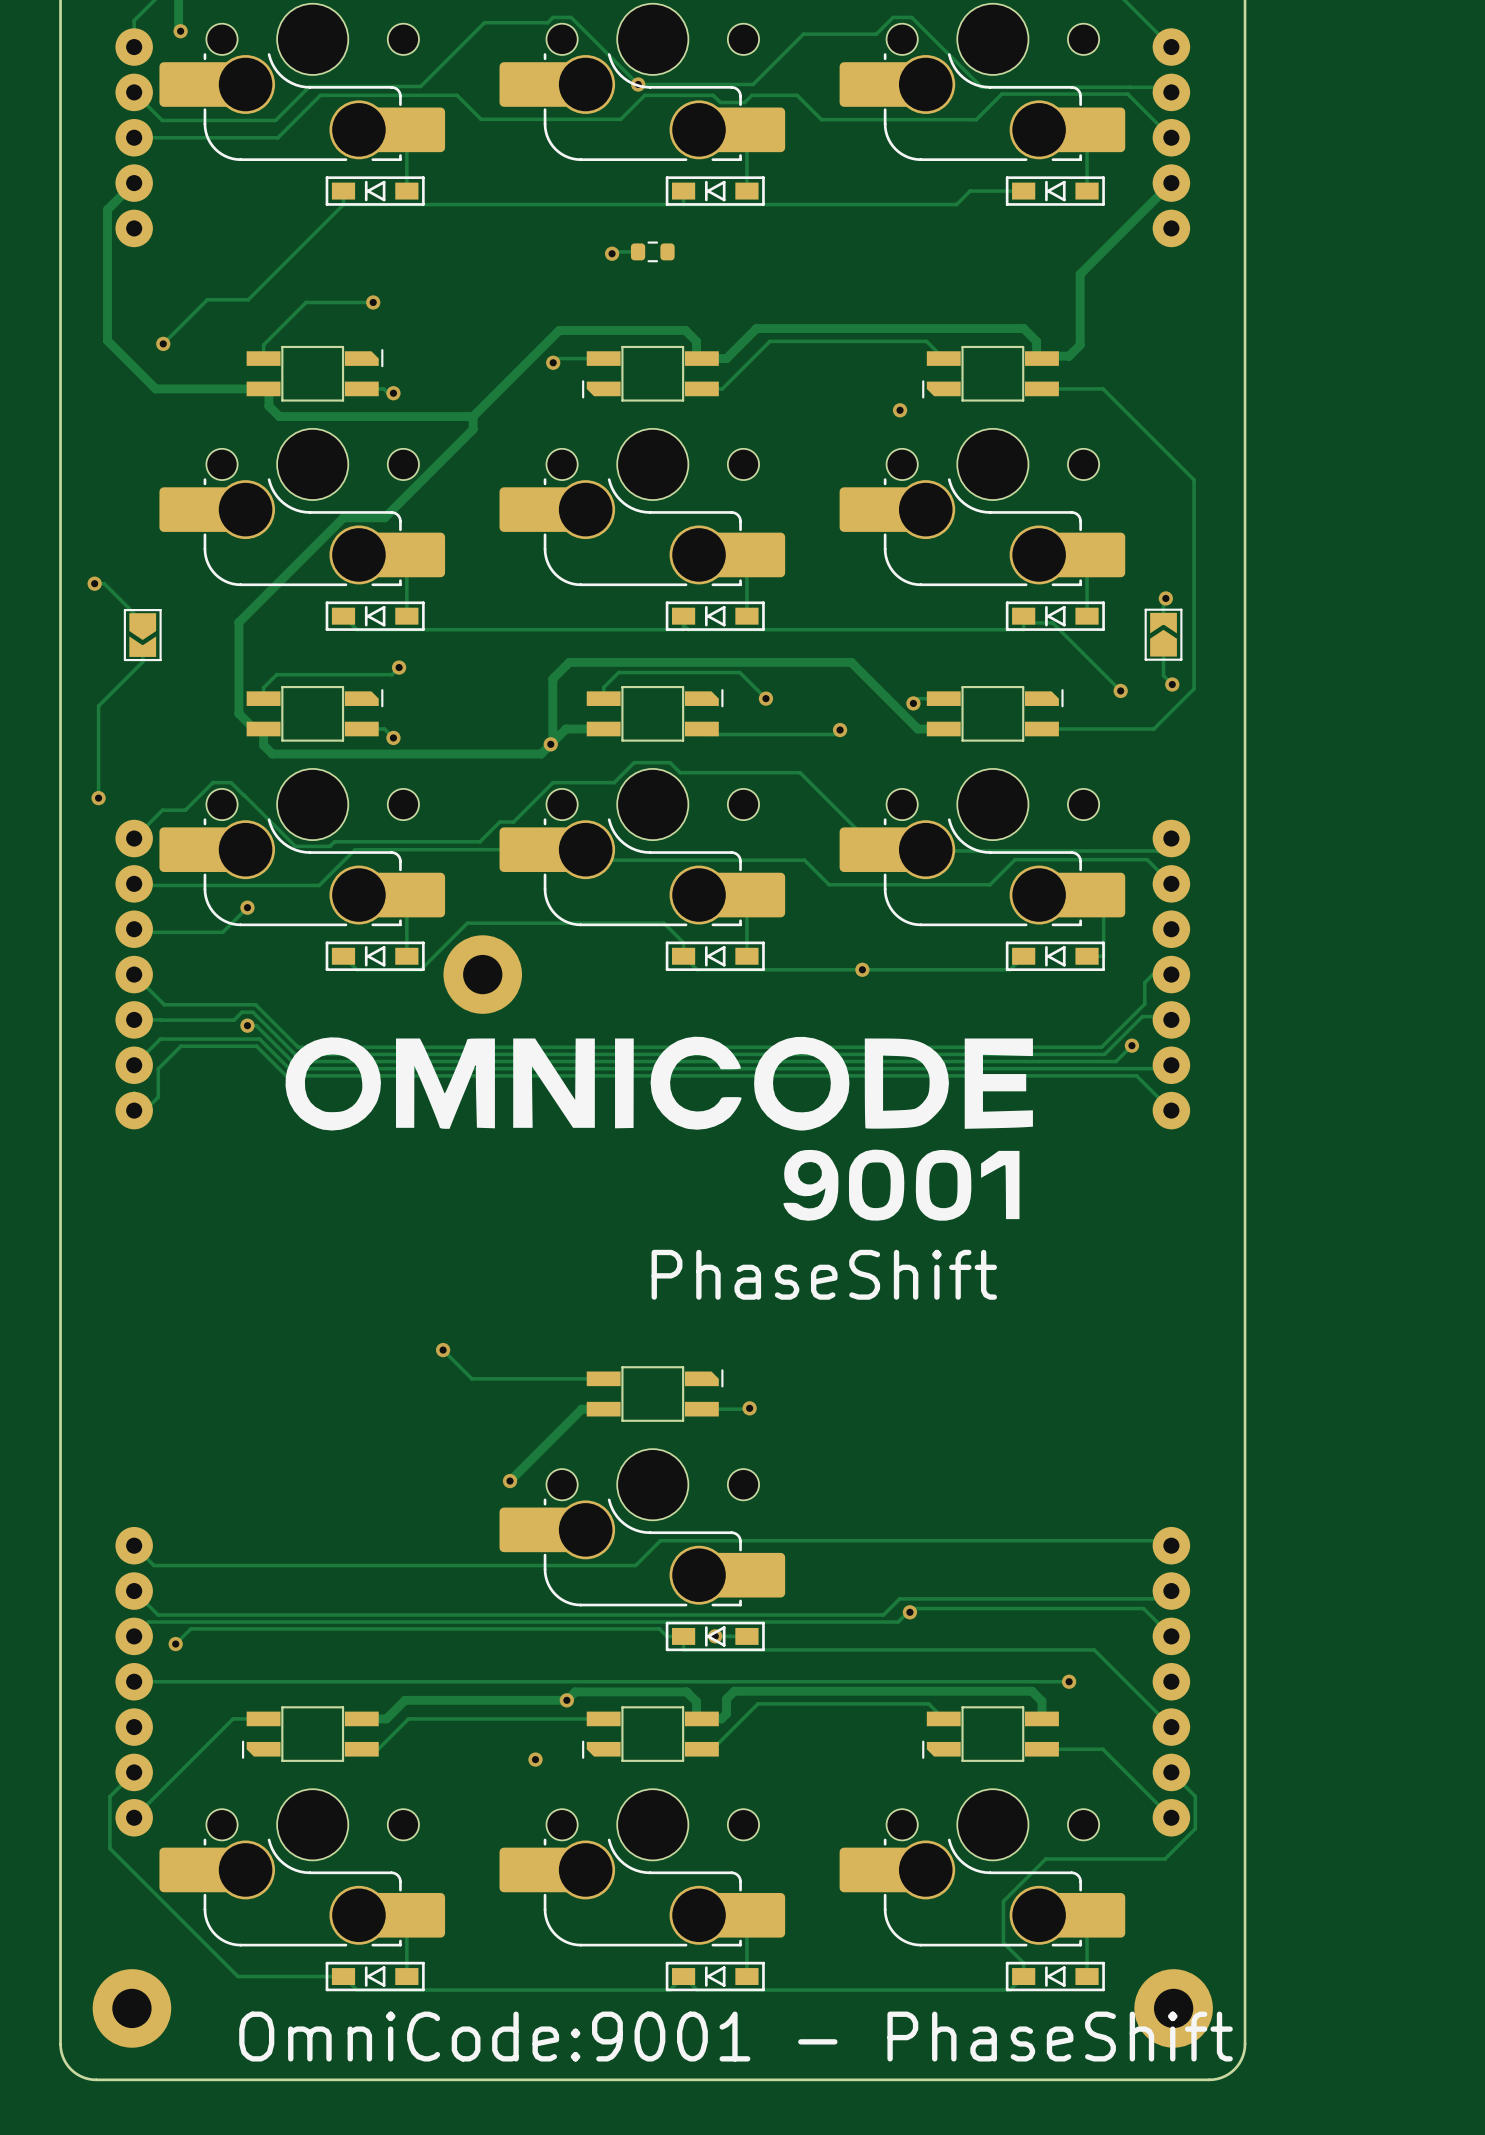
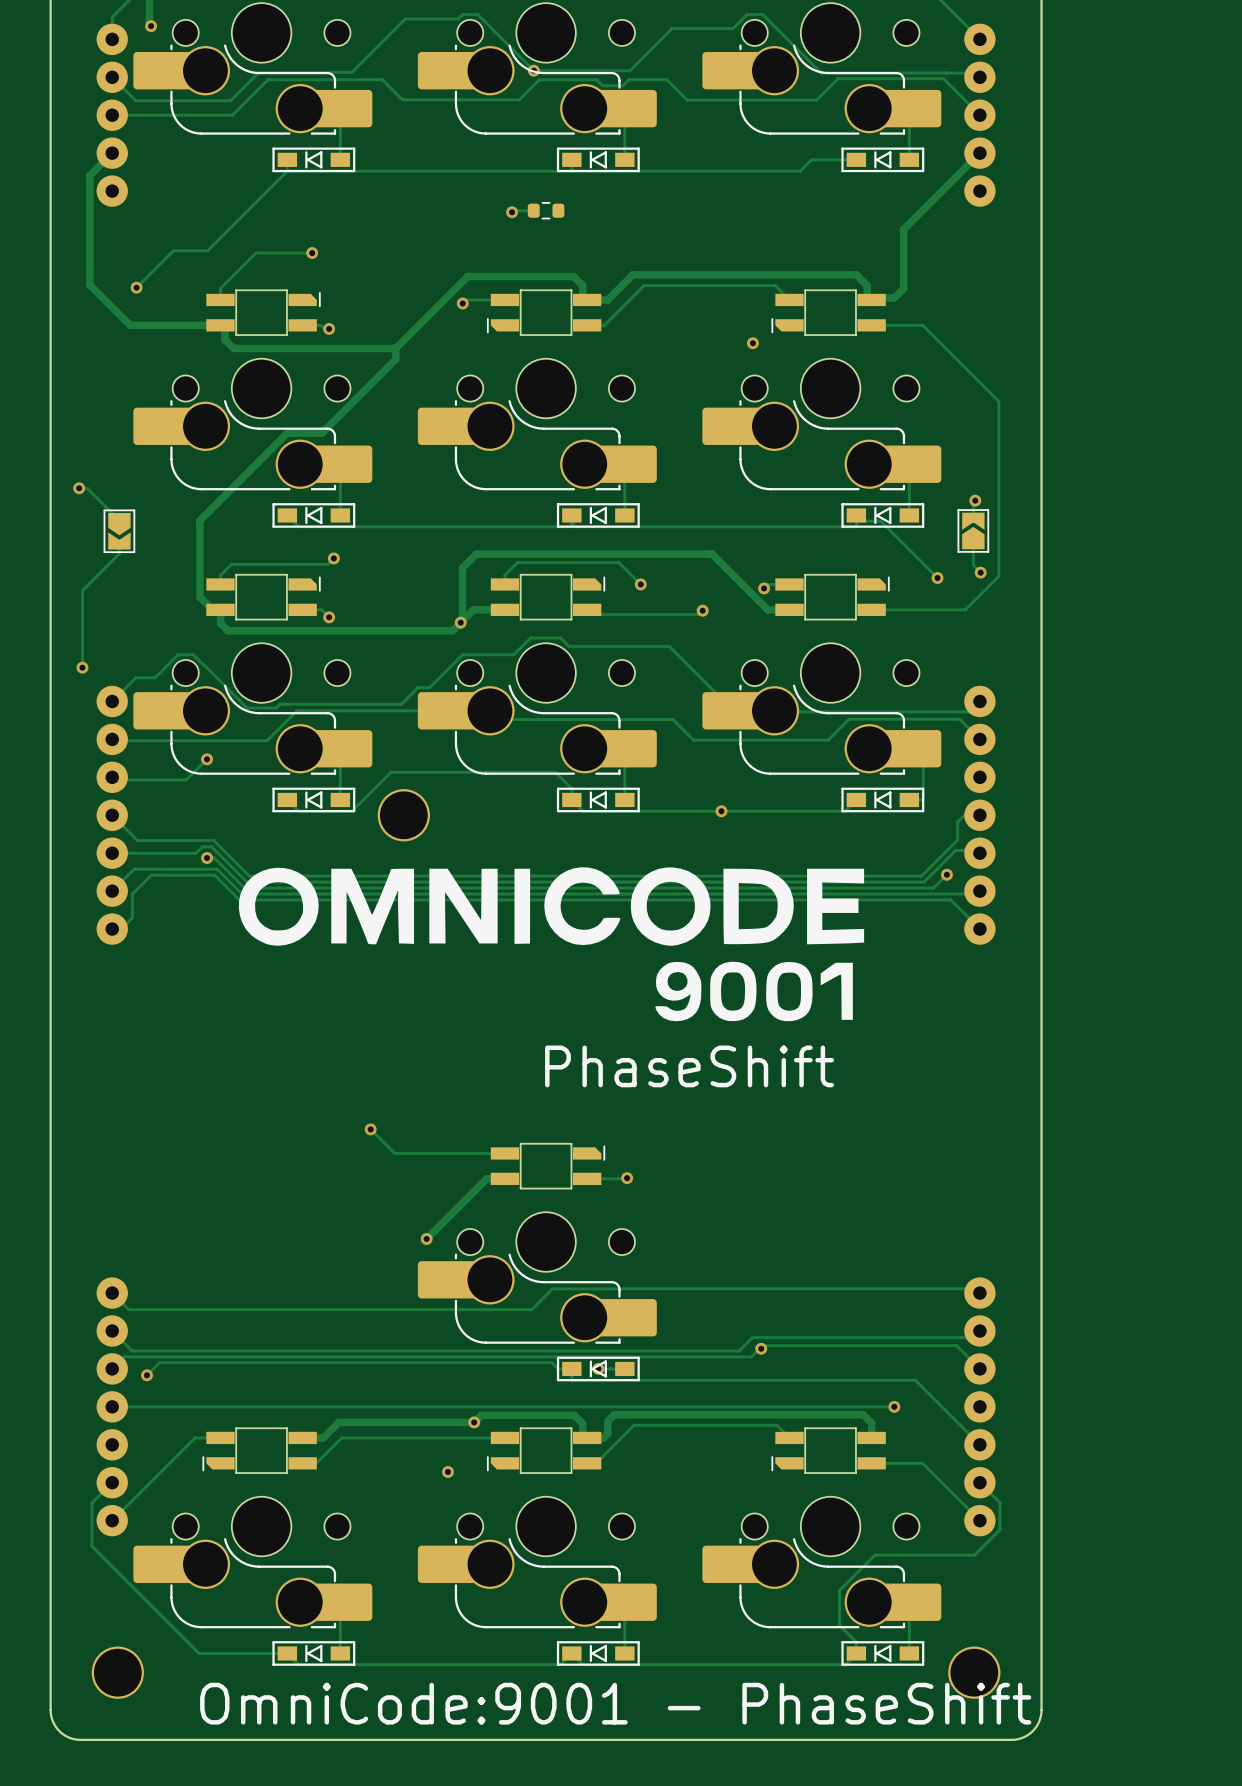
part footprint: [443, 935, 523, 1014] -> [377, 789, 430, 842]
part footprint: [92, 1969, 172, 2048] -> [91, 1646, 144, 1699]
part footprint: [1134, 1969, 1213, 2048] -> [948, 1646, 1001, 1699]

